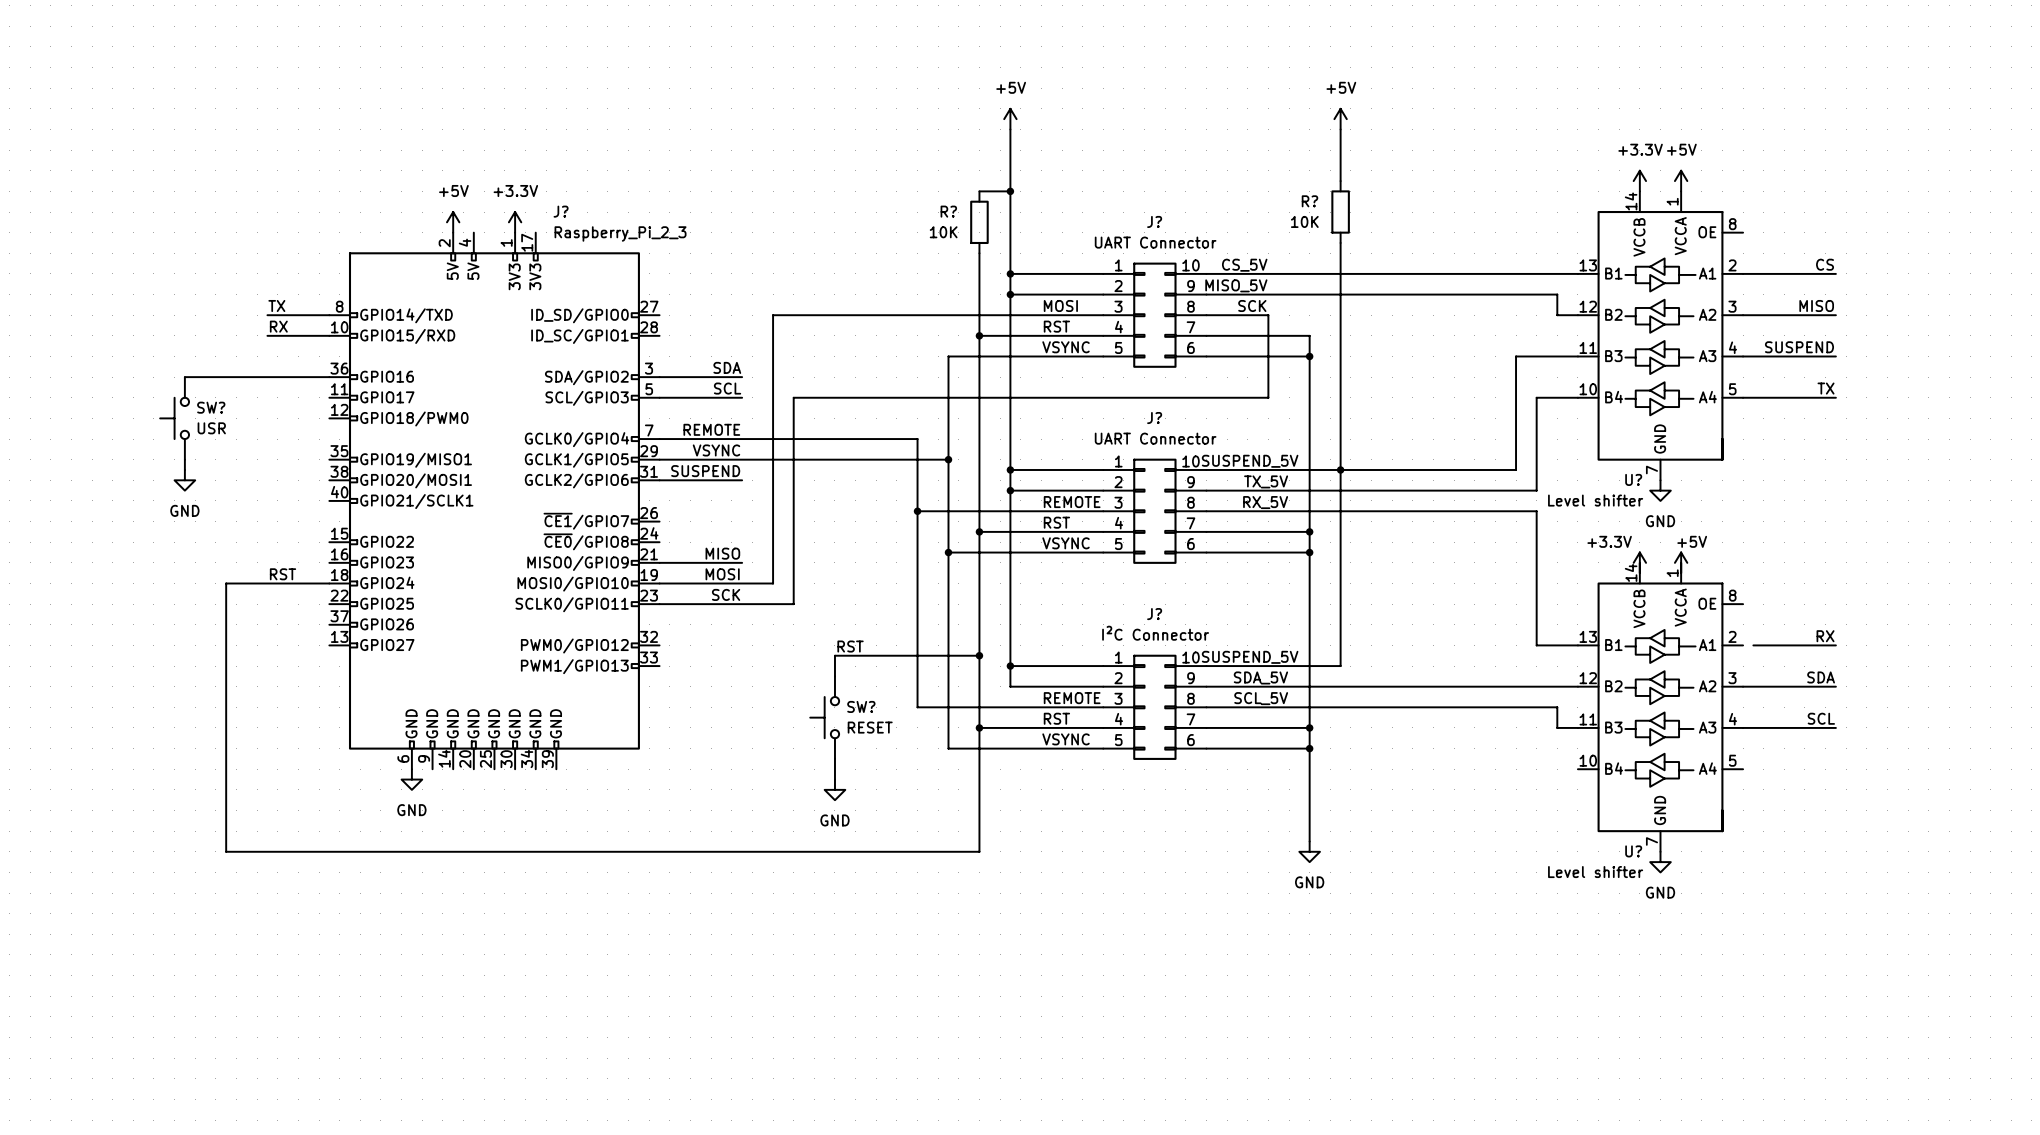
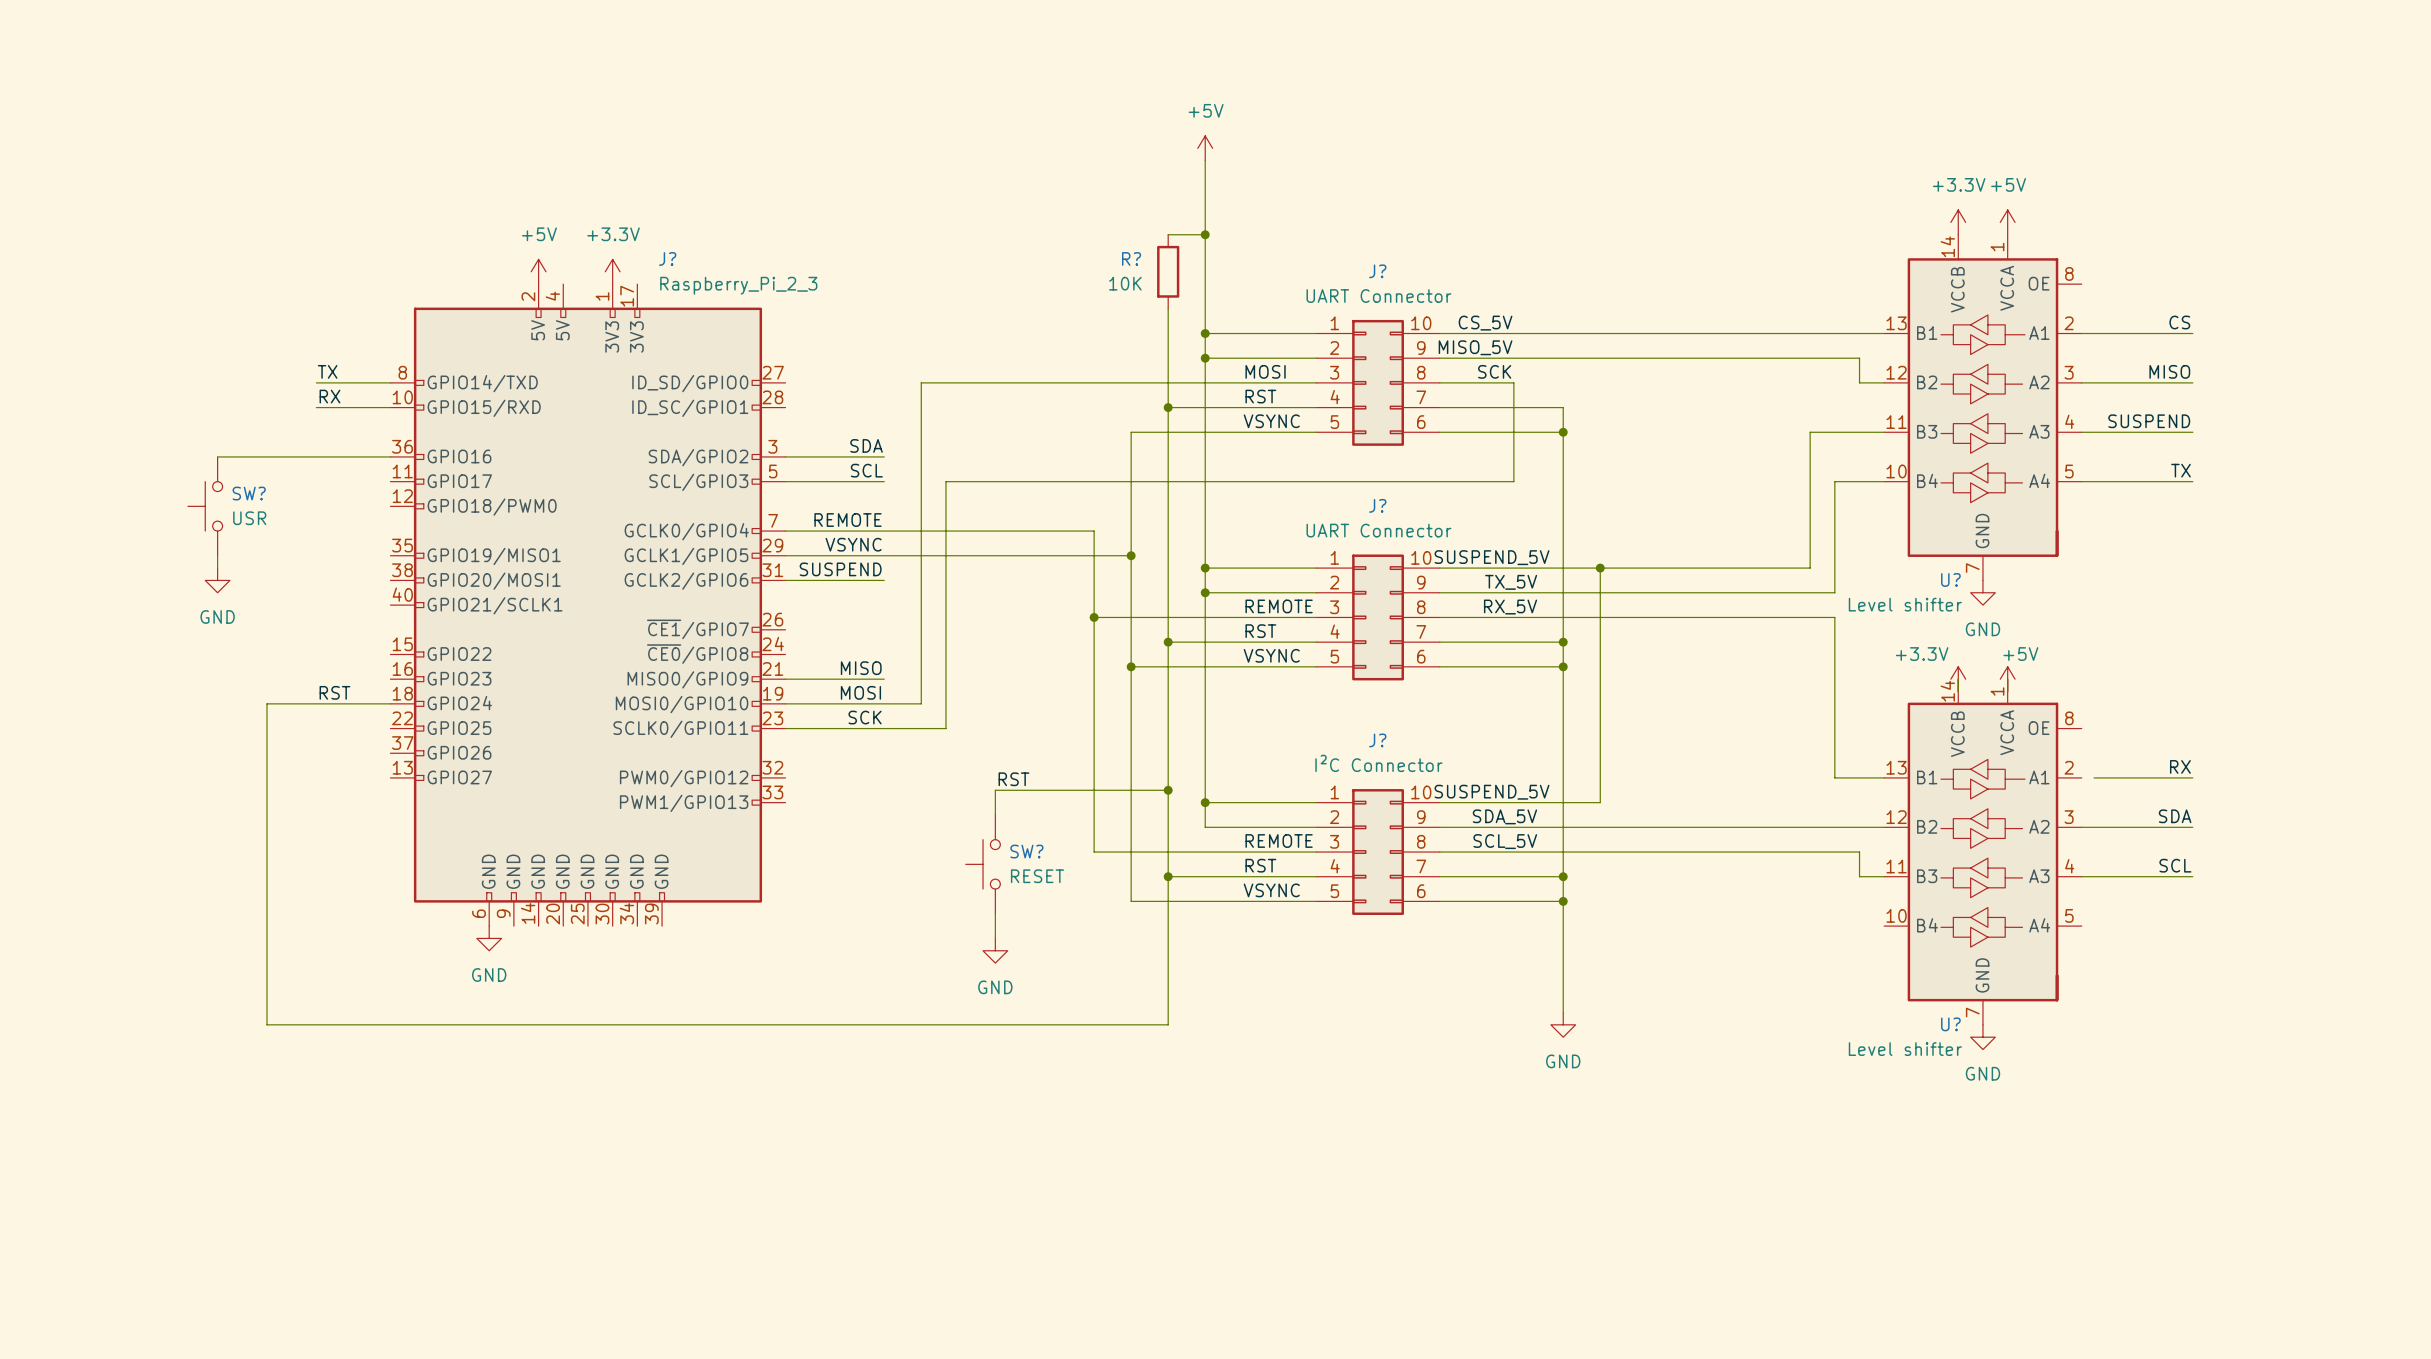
power symbol: +5V (1340, 119) -> none
wire: (1340, 129) (1340, 181) -> none
R?: 10K (1340, 212) -> none
wire: (1340, 242) (1340, 469) -> none

